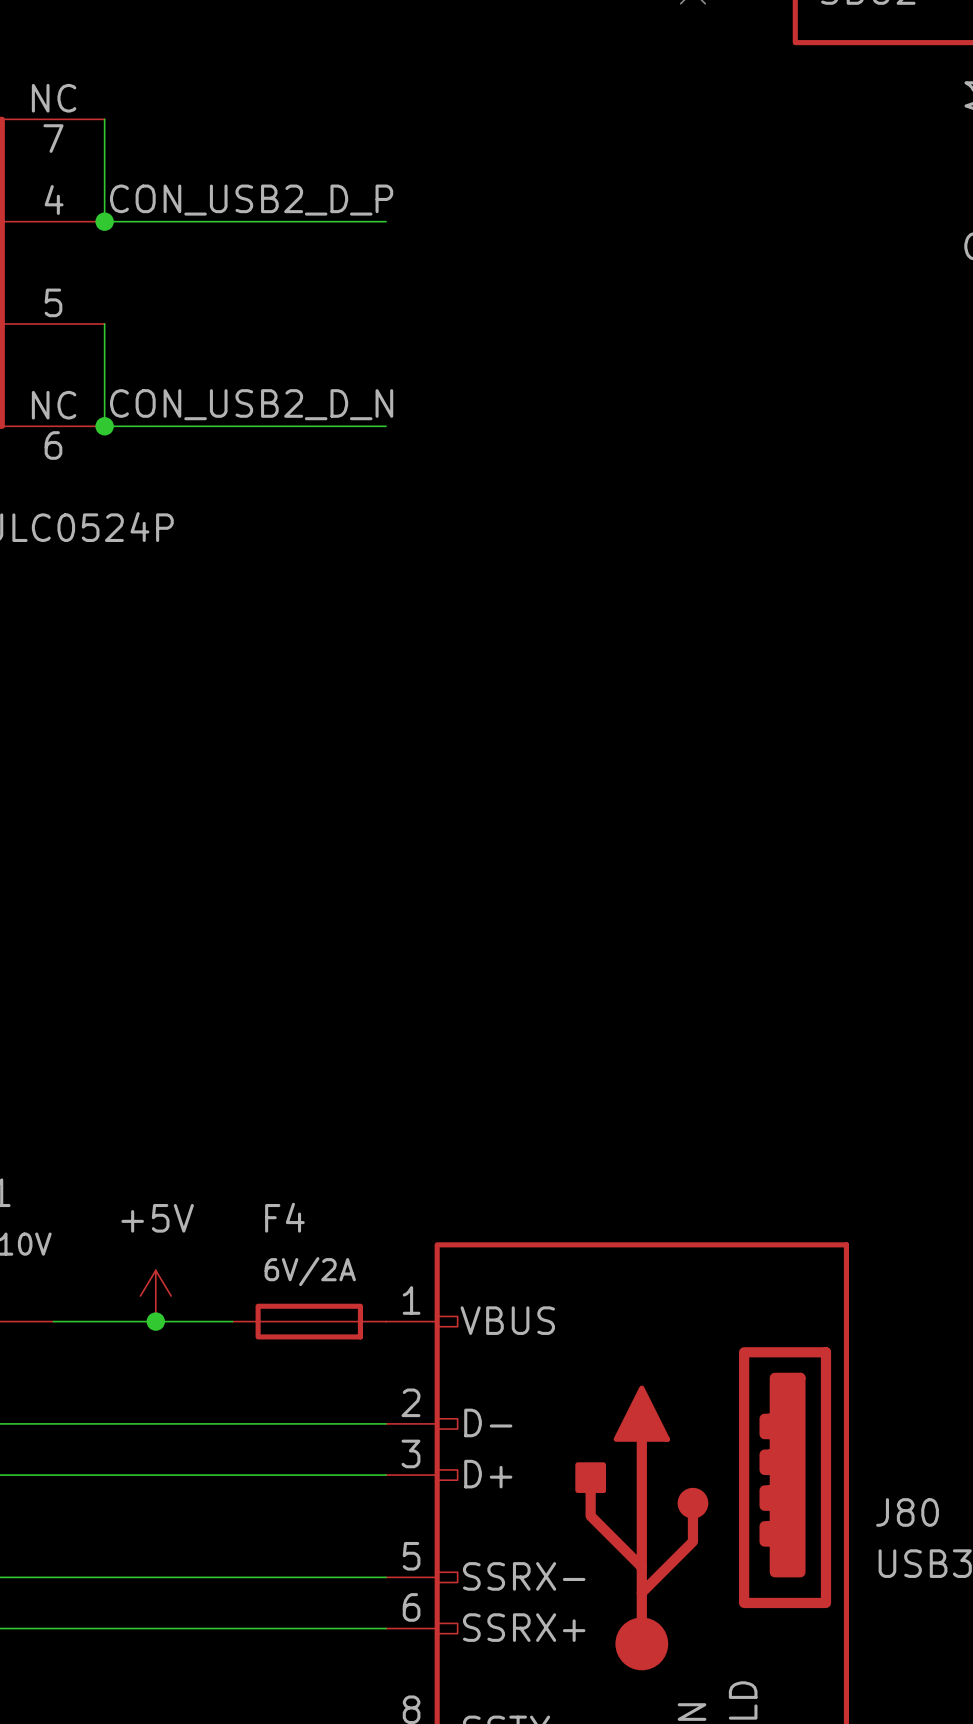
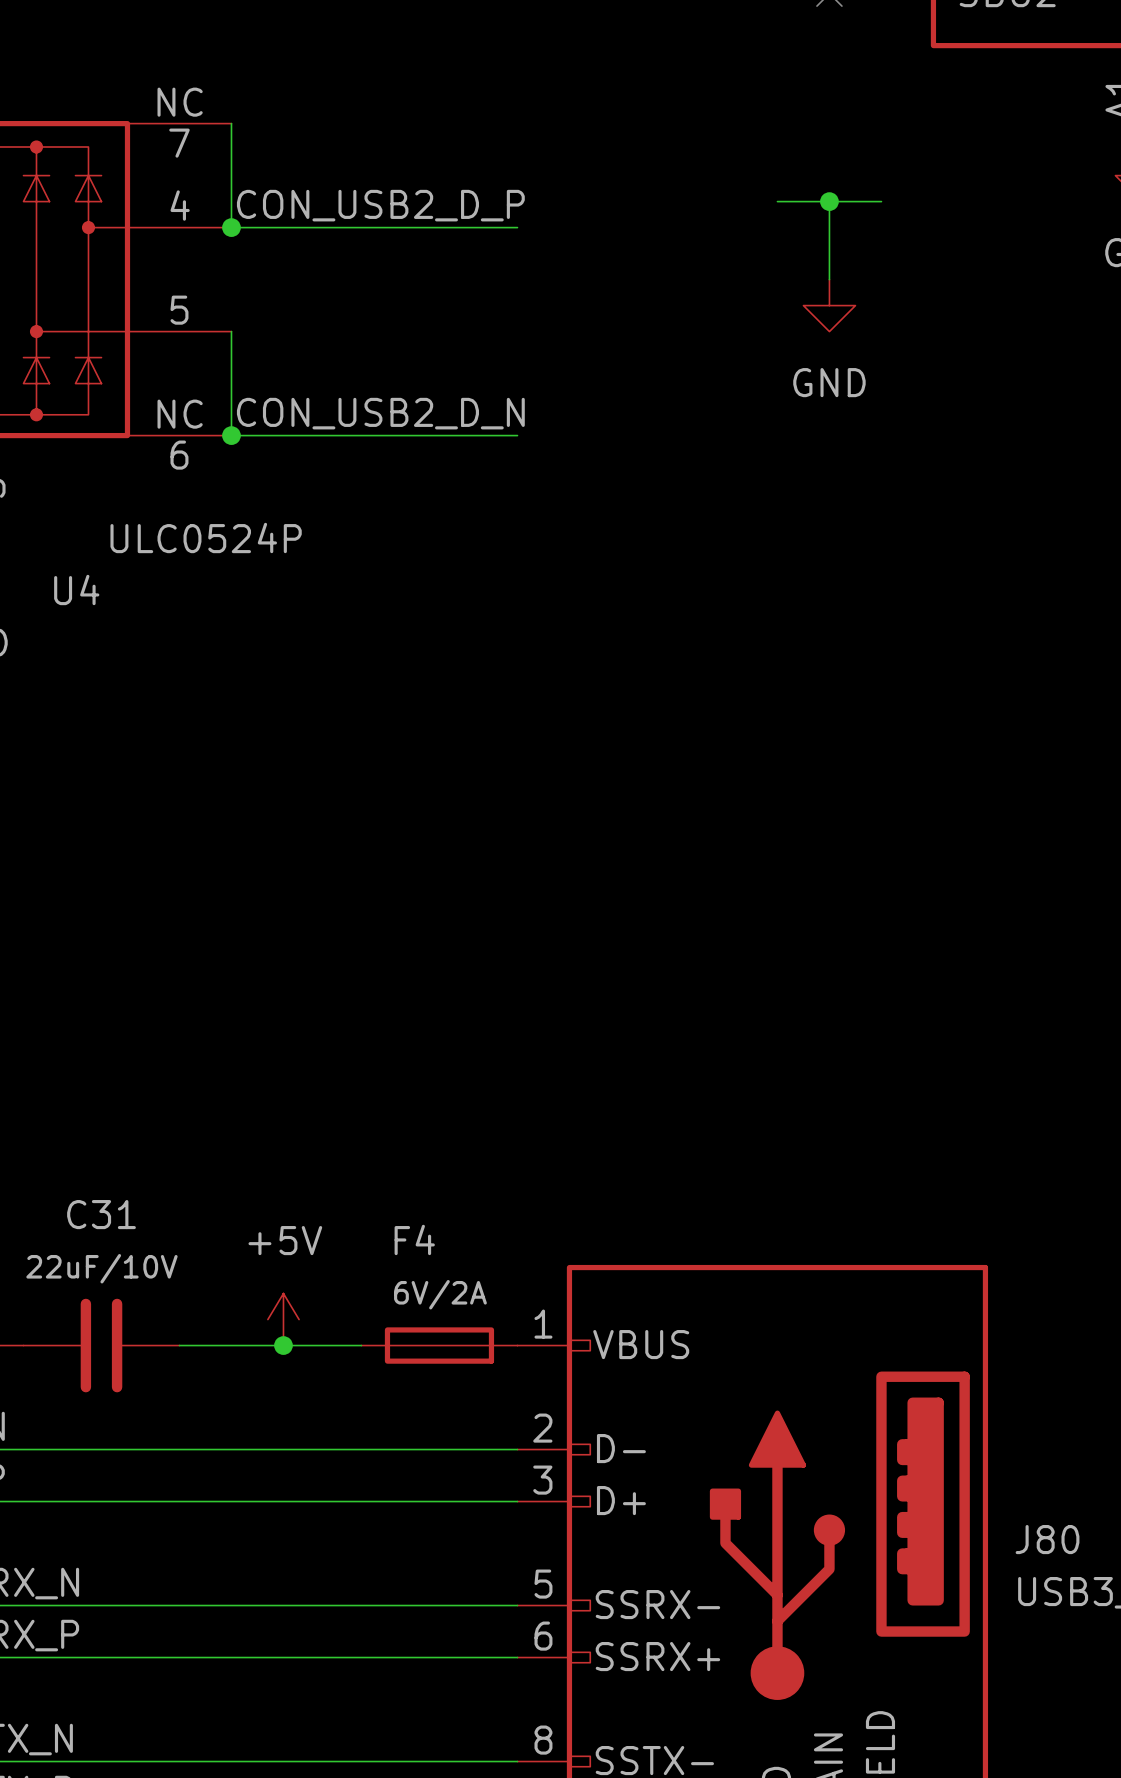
wire: none -> (777, 201) (881, 201)
wire: none -> (829, 201) (829, 279)
junction: none -> (829, 201)
power symbol: none -> GND (829, 305)

